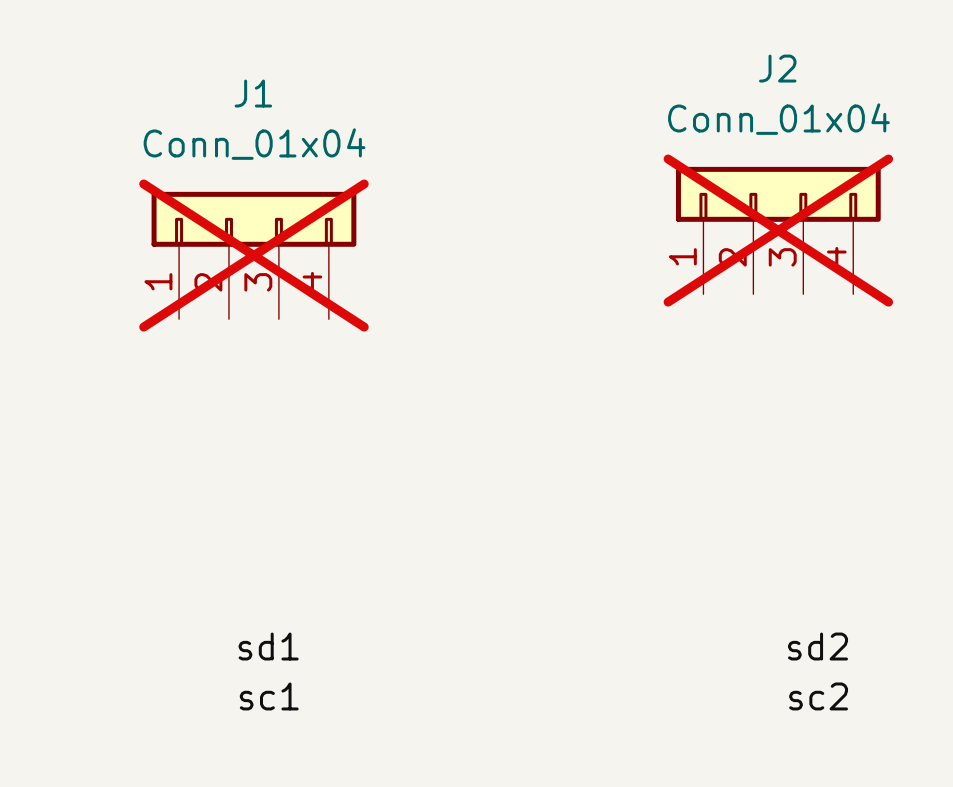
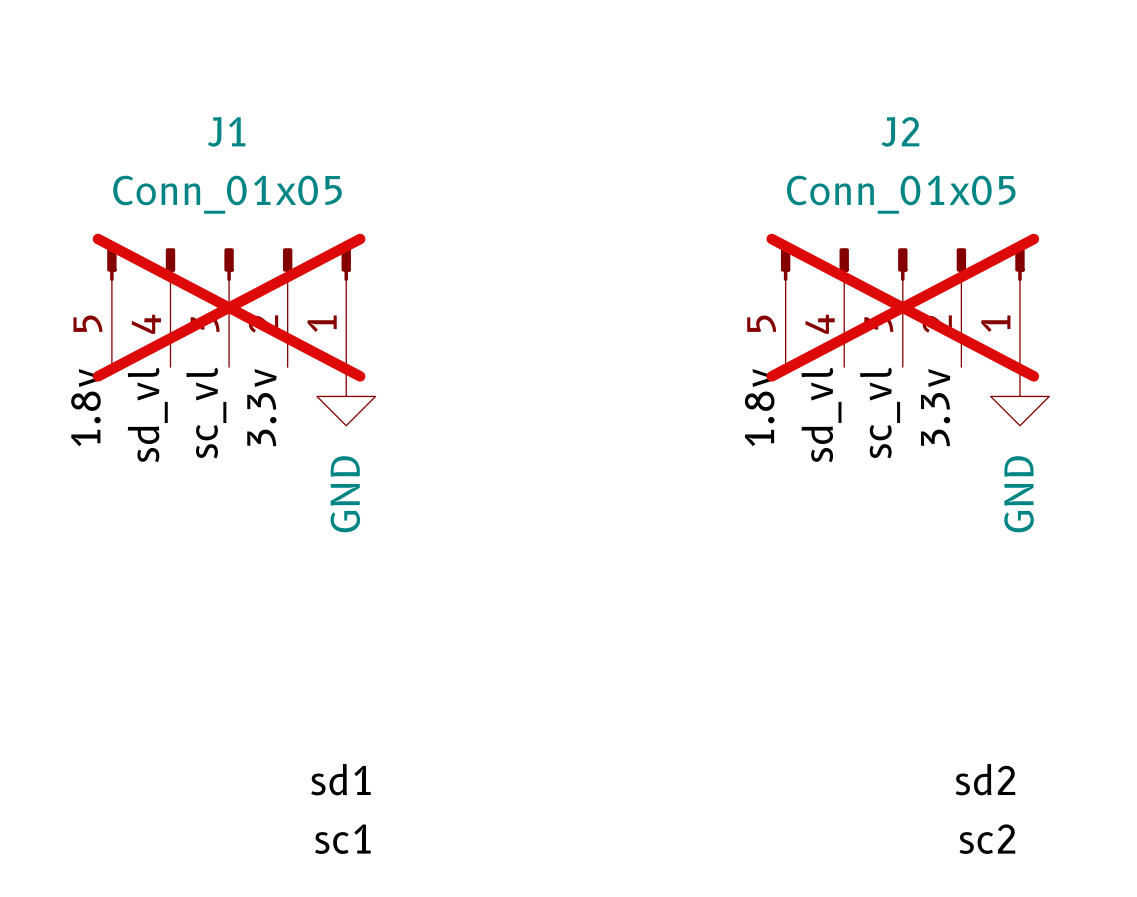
J2 value: Conn_01x04 (778, 119) -> Conn_01x05 (901, 194)
J1 value: Conn_01x04 (254, 144) -> Conn_01x05 (227, 194)
J2 symbol: [675, 166, 881, 295] -> [780, 248, 1025, 368]
J1 symbol: [151, 191, 357, 320] -> [107, 248, 351, 368]
power symbol: none -> GND (346, 396)
power symbol: none -> GND (1019, 396)
label: none -> 1.8v (85, 407)
label: none -> 1.8v (759, 407)
label: none -> 3.3v (261, 407)
label: none -> 3.3v (935, 407)
label: none -> sc_vl (206, 413)
label: none -> sc_vl (880, 413)
label: none -> sd_vl (147, 414)
label: none -> sd_vl (821, 414)

